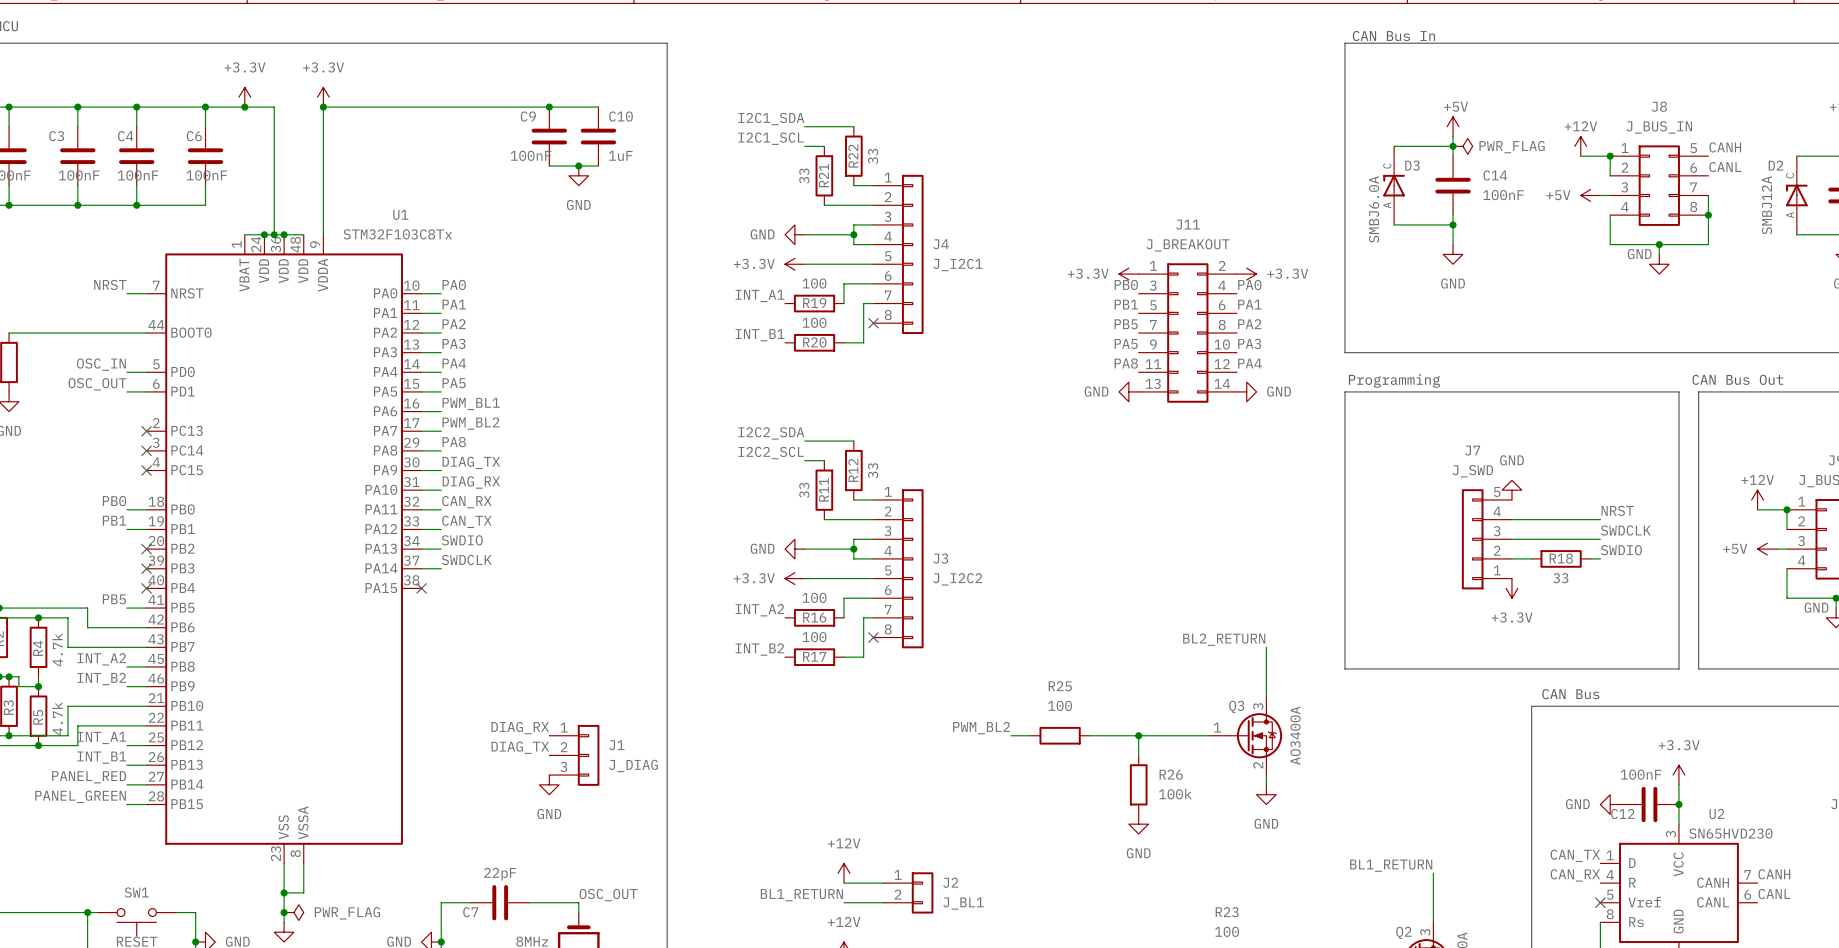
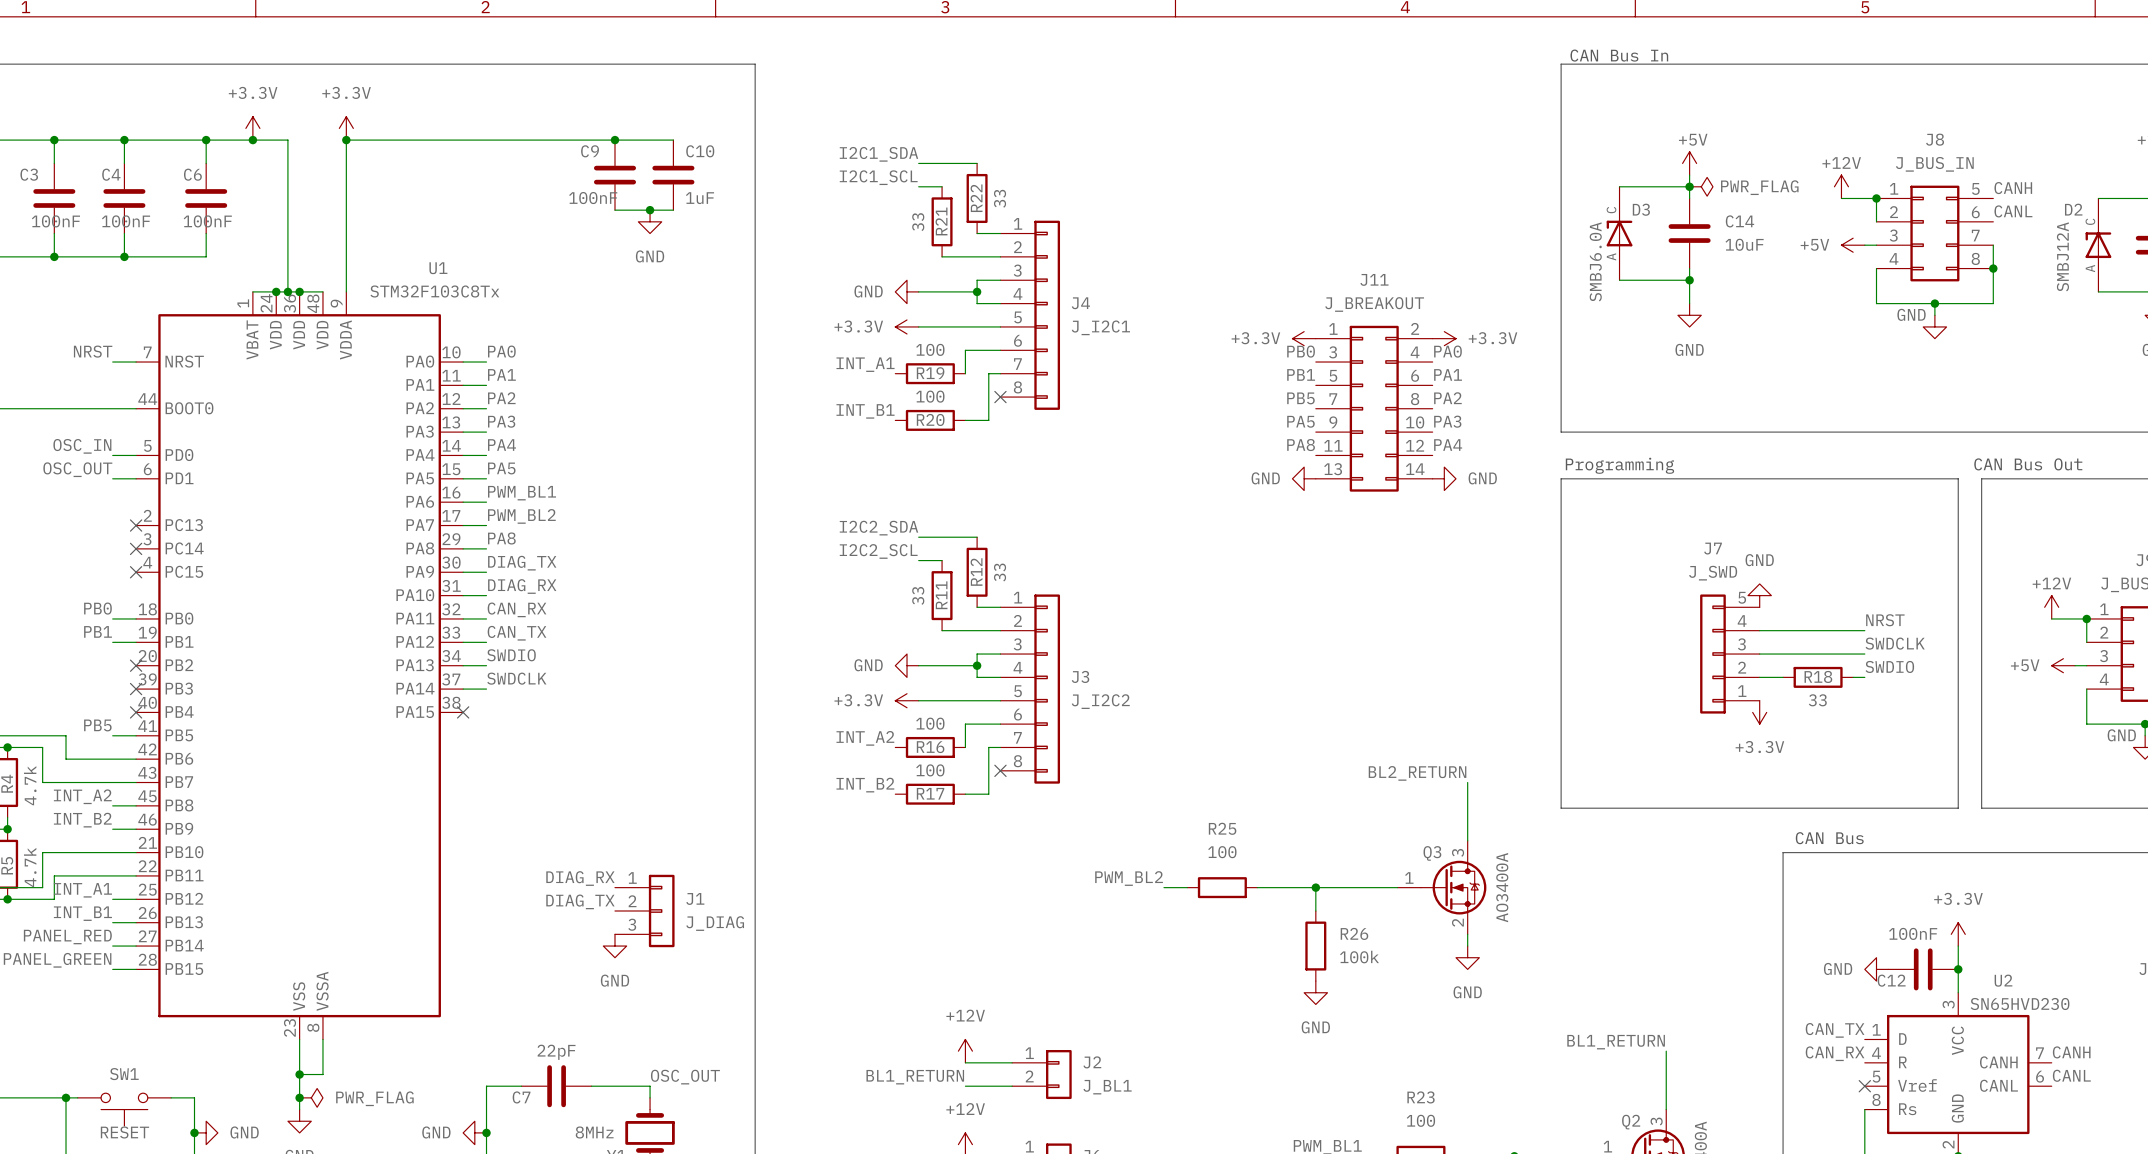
C14 value: 100nF (1503, 195) -> 10uF (1744, 244)

